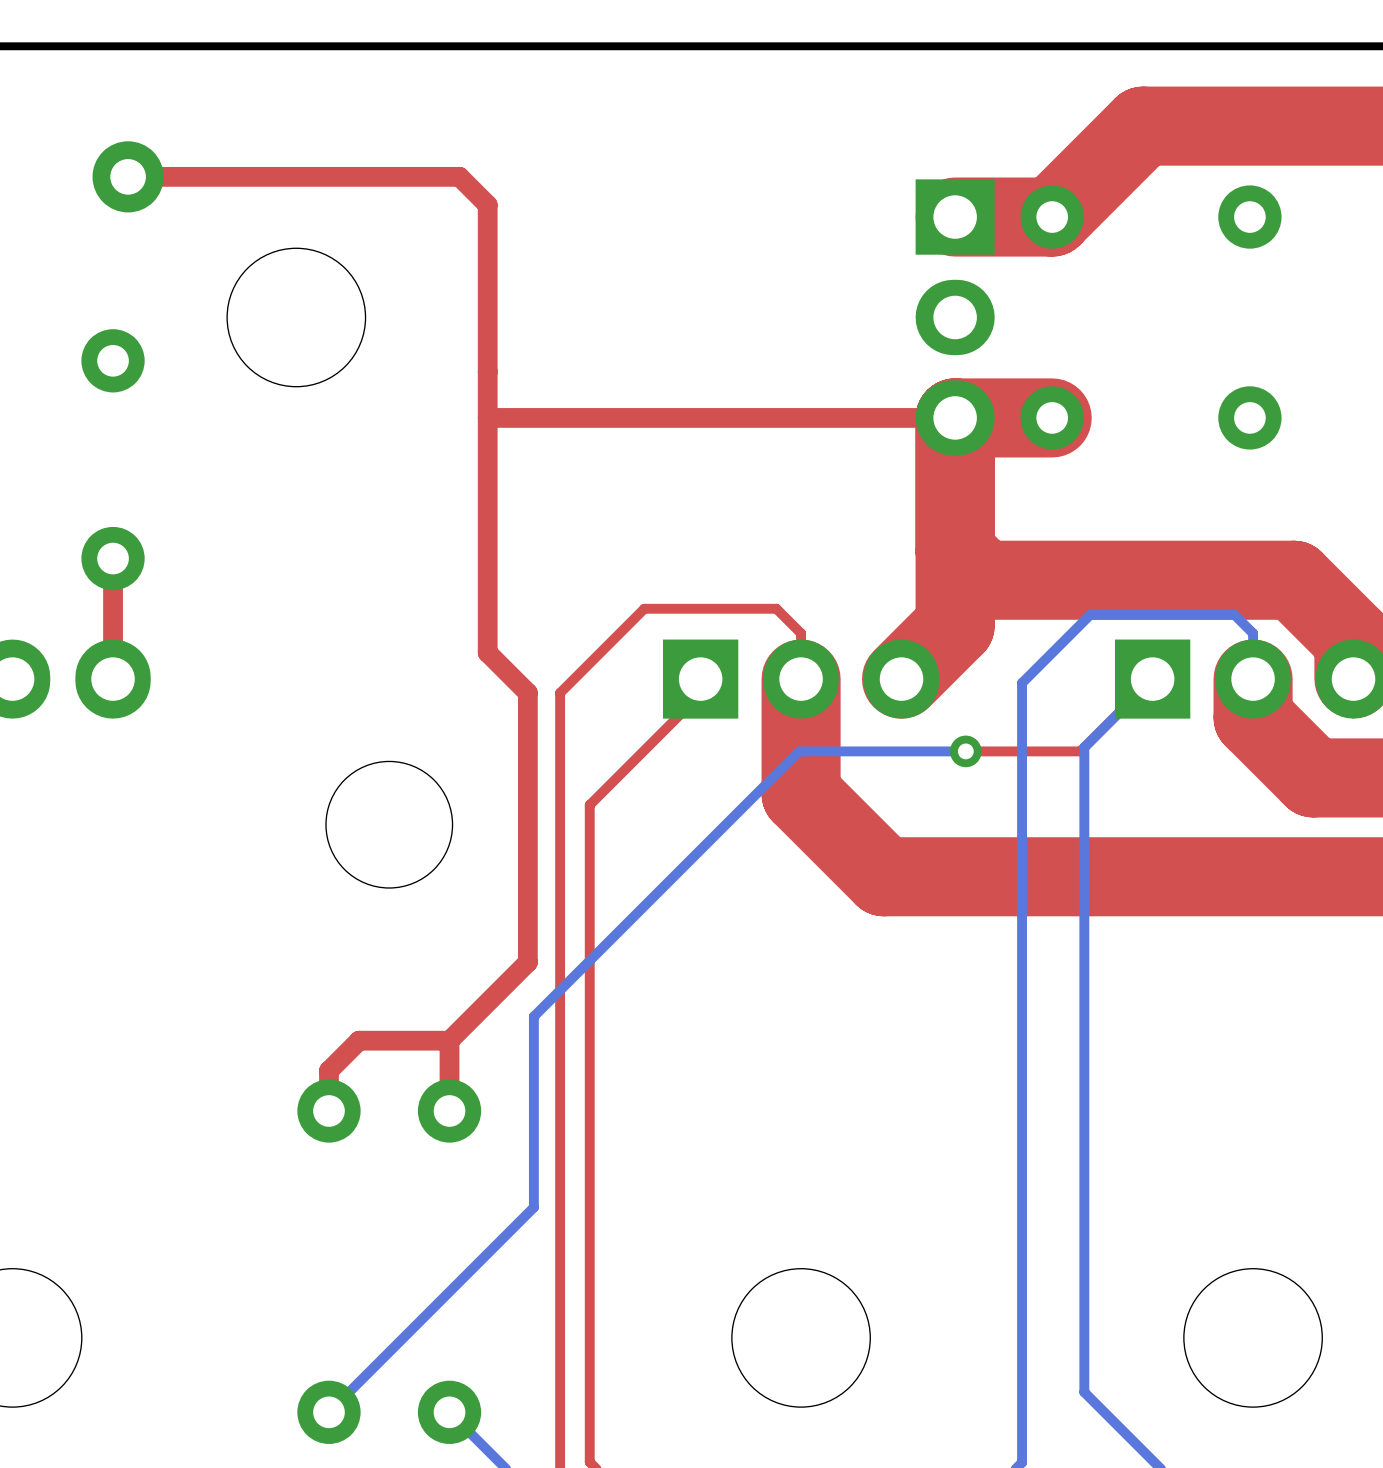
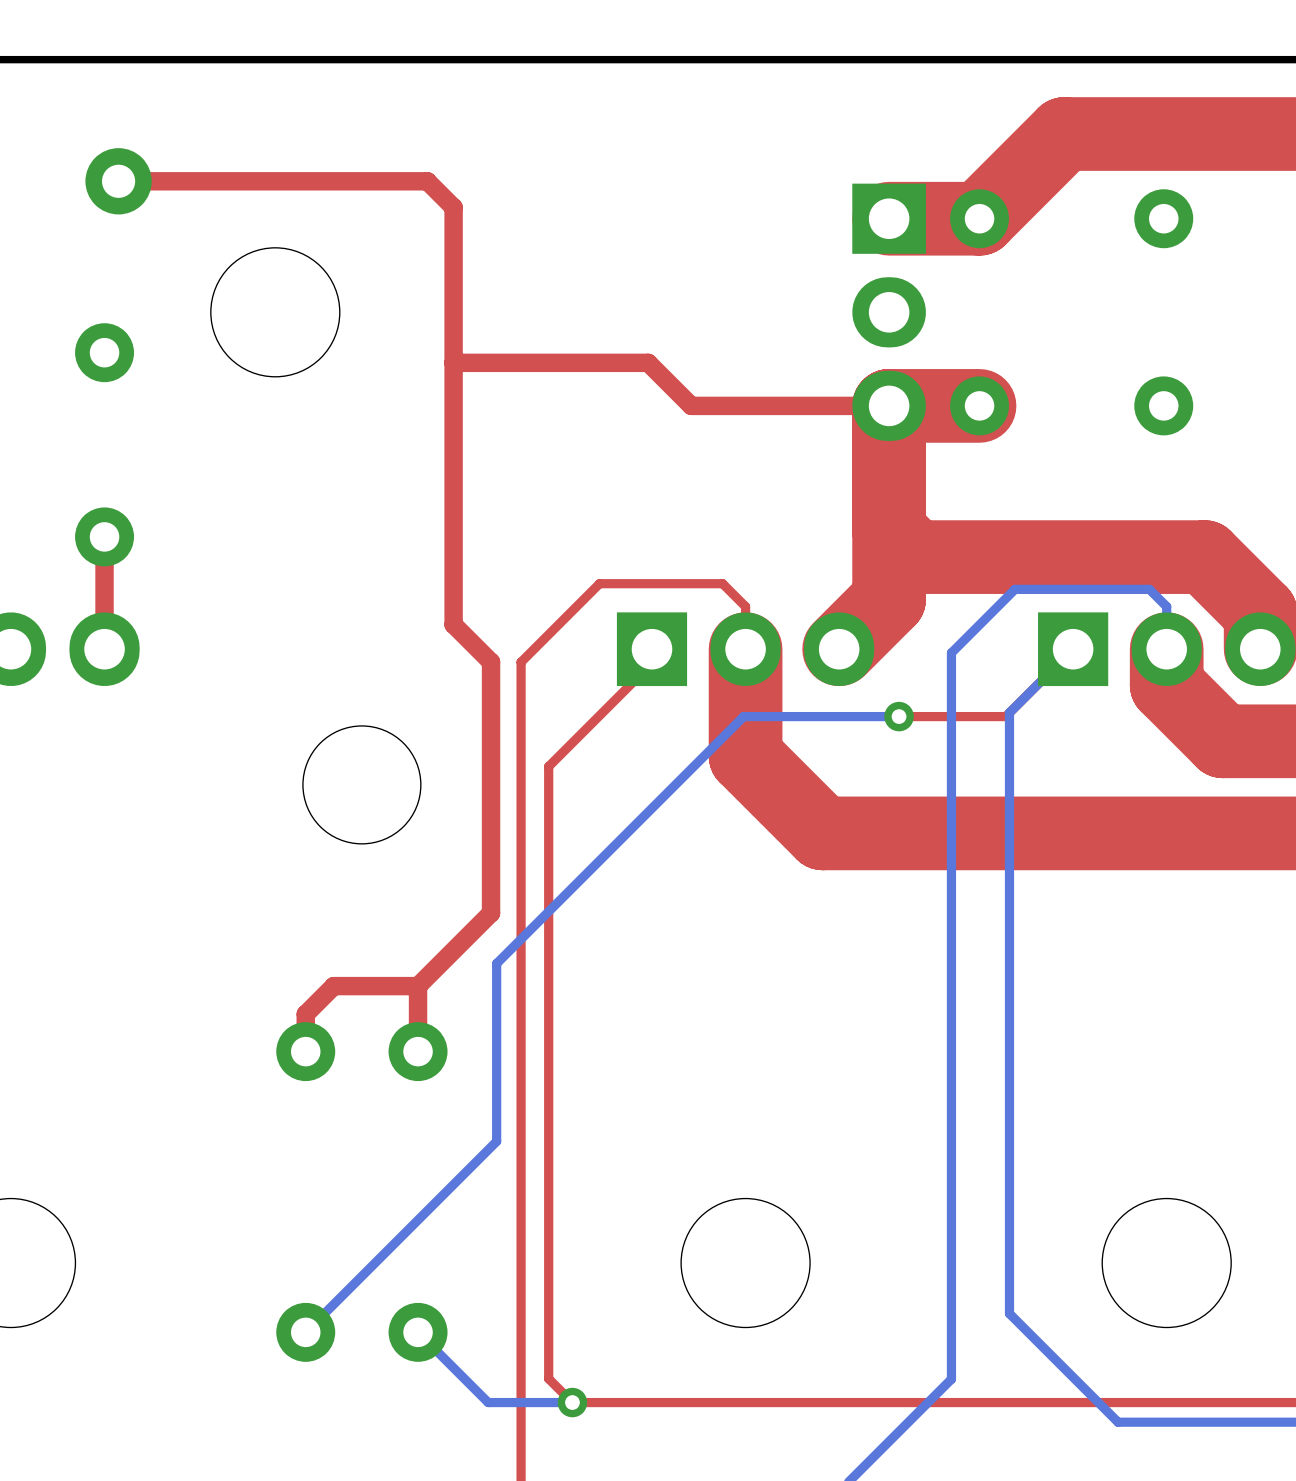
top track: (742, 417) (487, 417) -> (691, 405) (648, 362) (453, 362)

